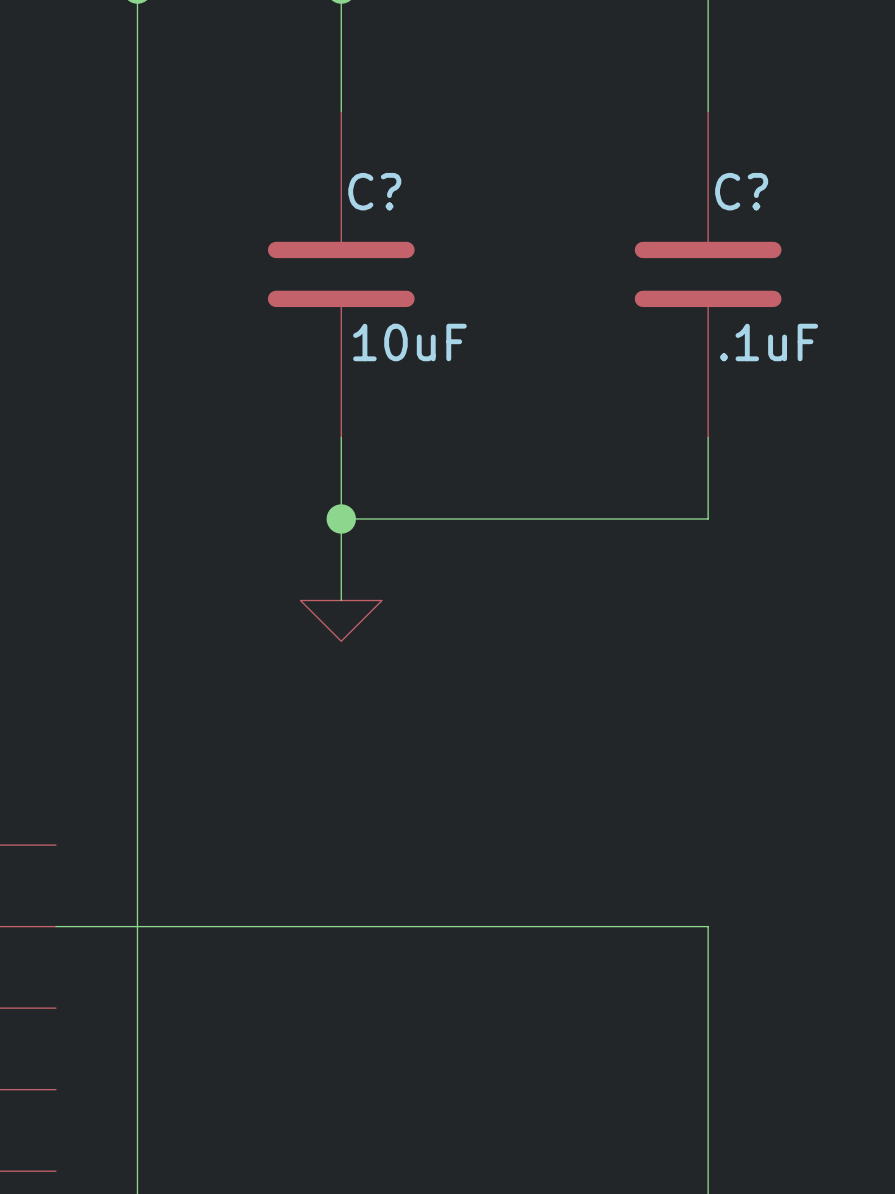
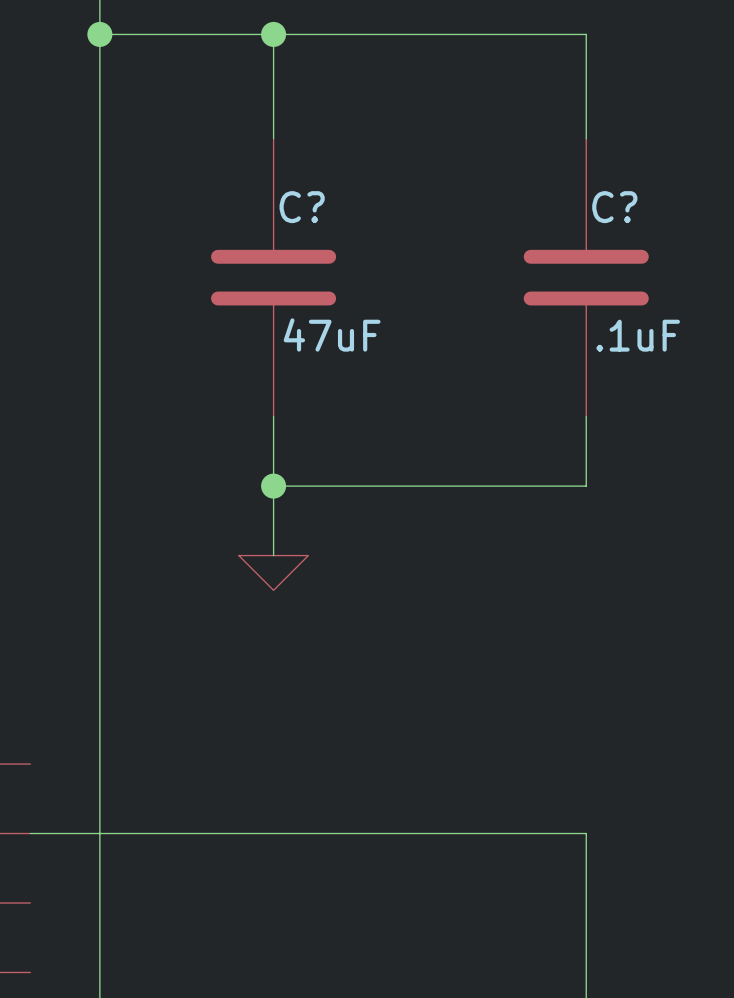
C? value: 10uF (409, 342) -> 47uF (332, 335)

